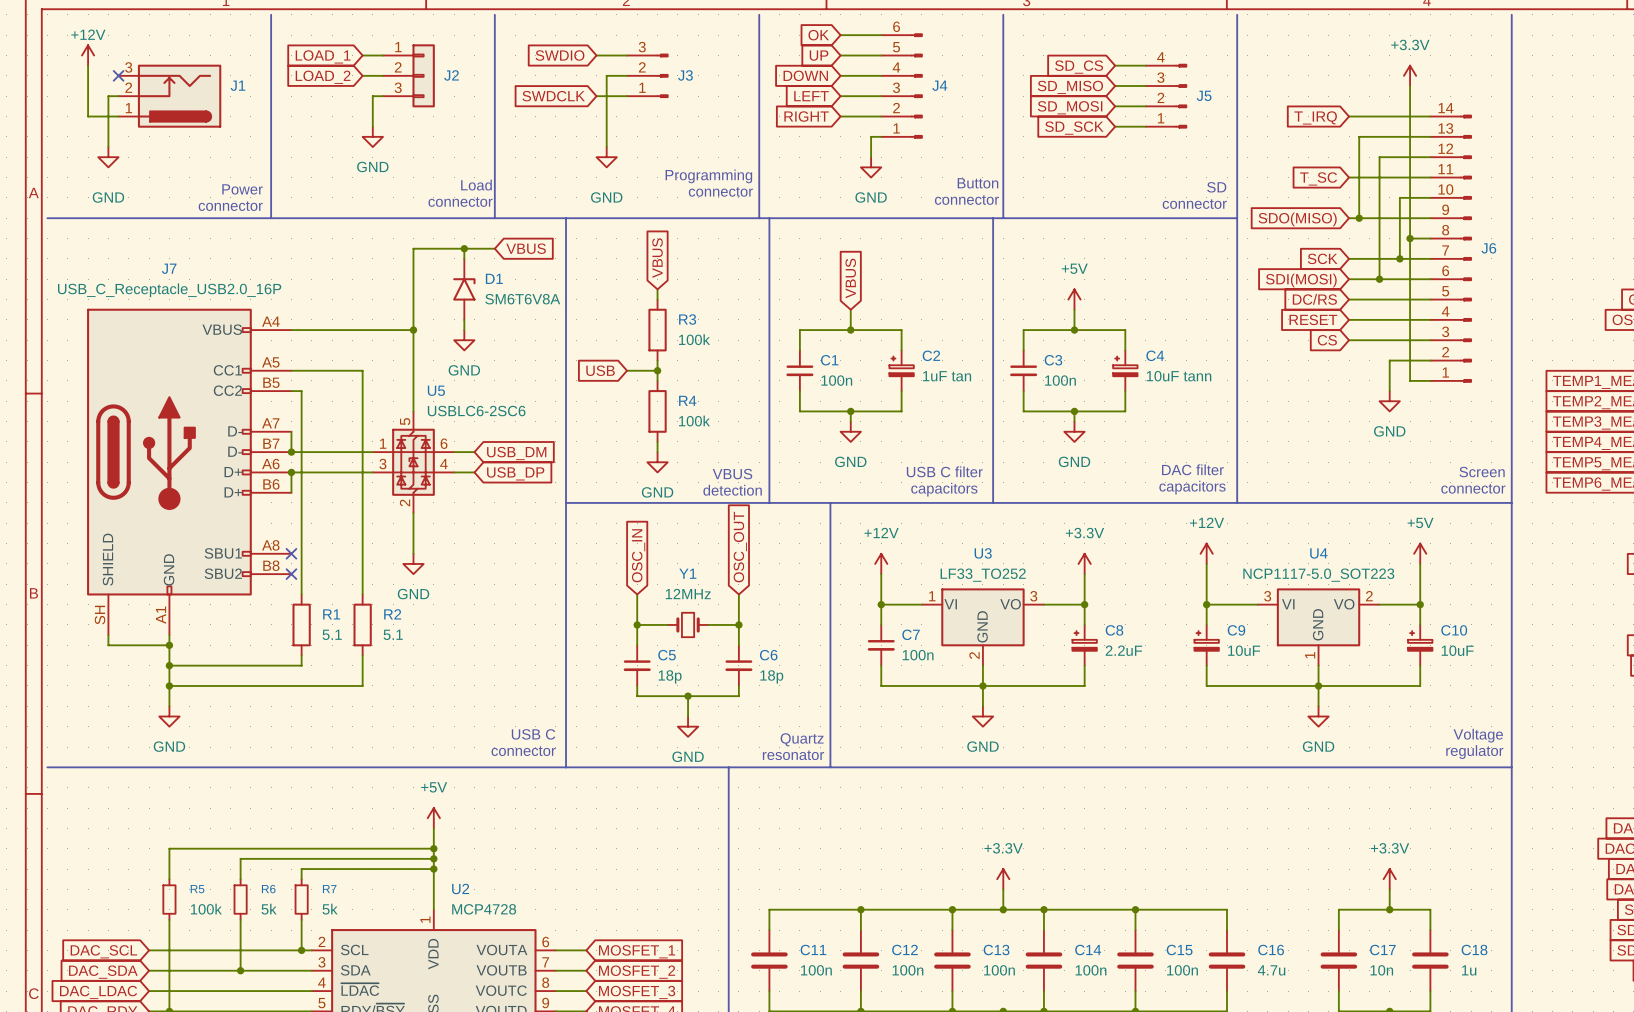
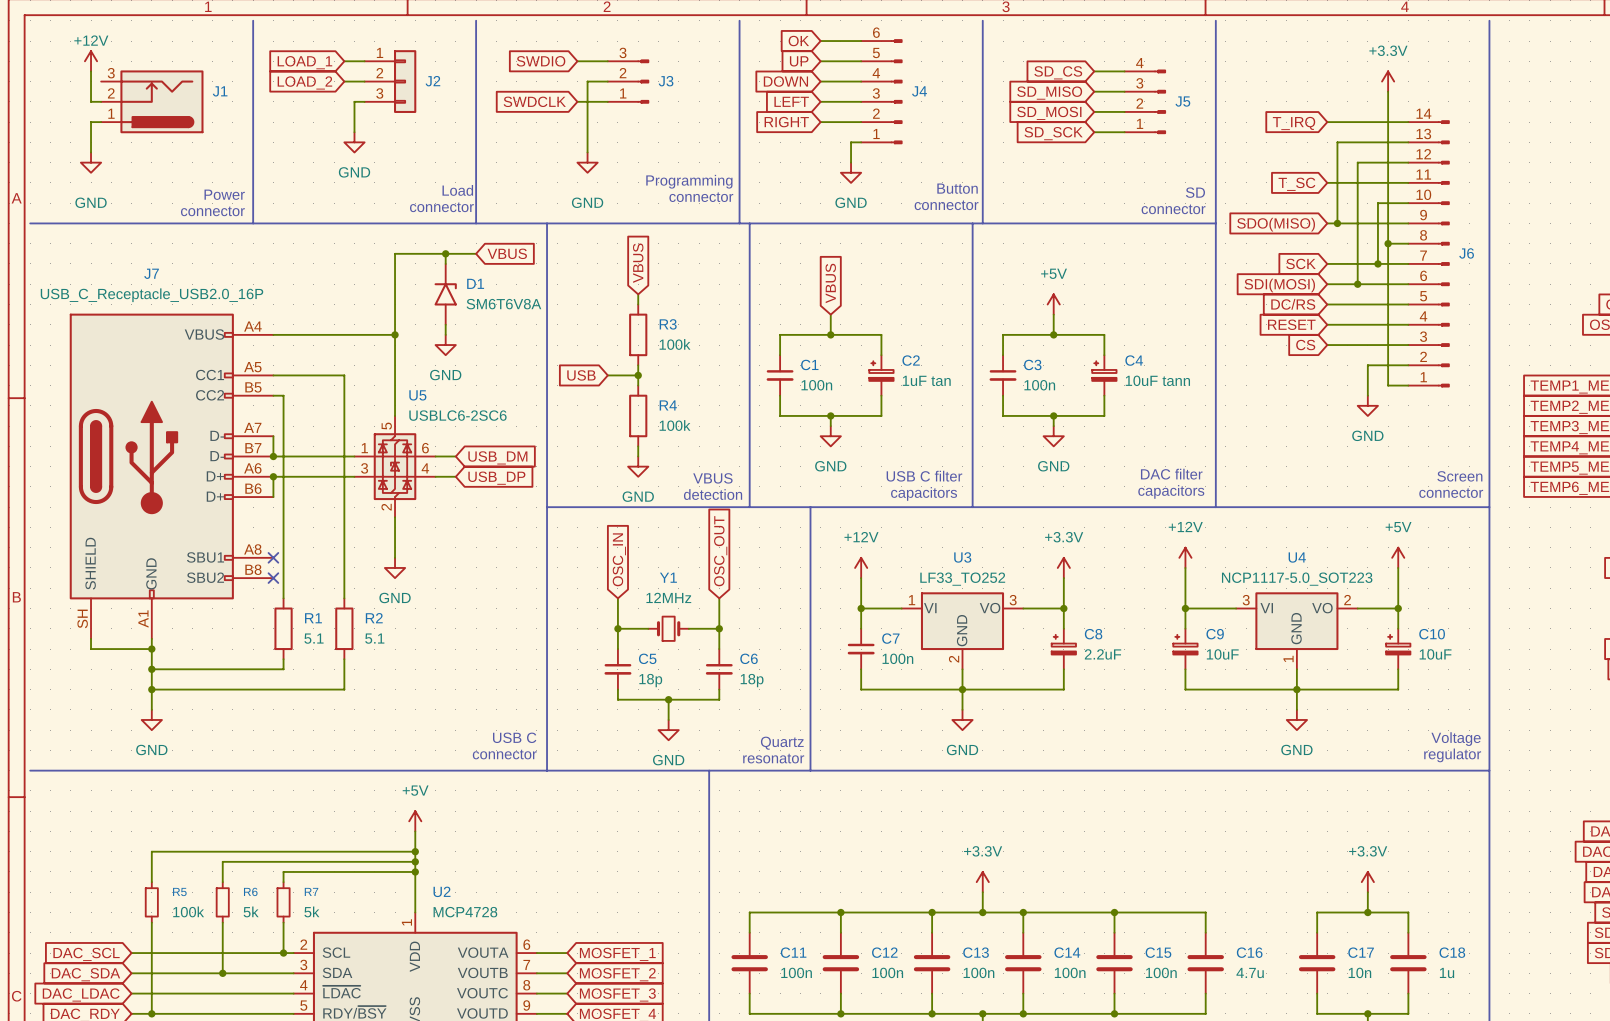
power symbol position: +12V (88, 55) -> +12V (91, 61)
wire: (88, 65) (88, 116) (108, 116) (108, 96) -> (91, 71) (91, 101)
no-connect mark: (118, 75) -> none

